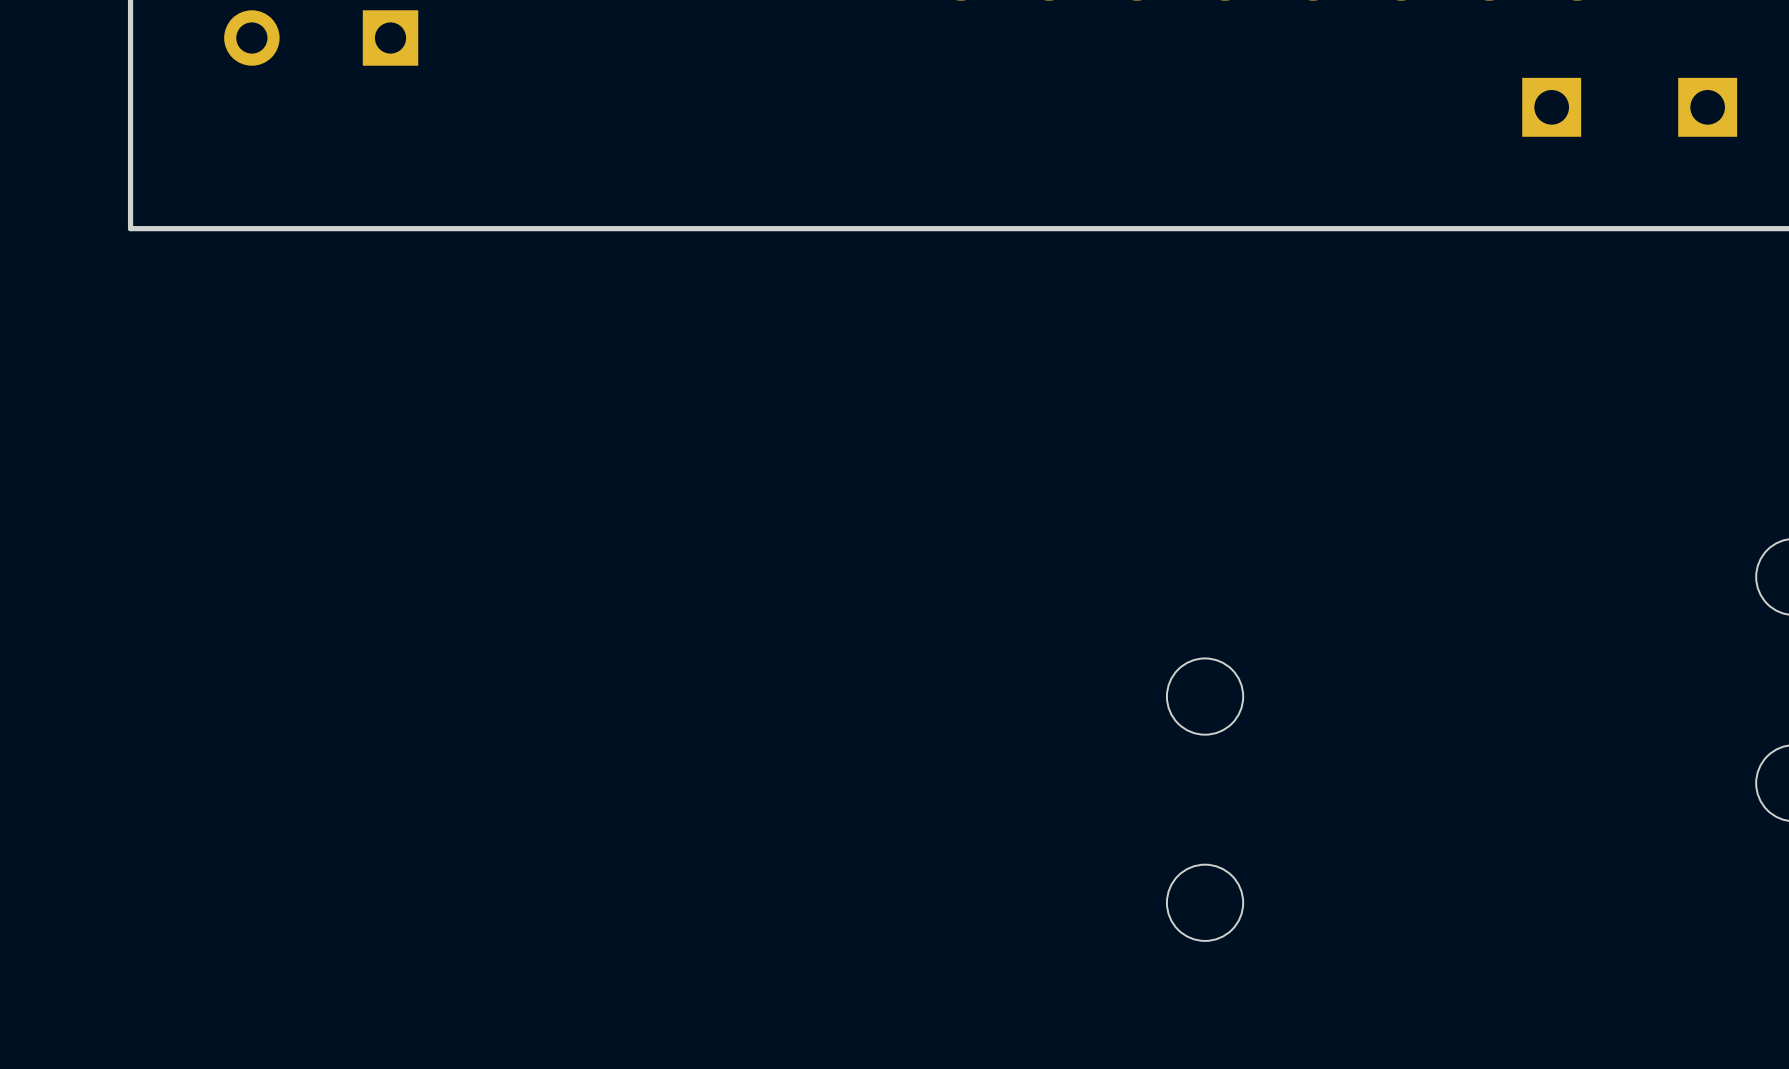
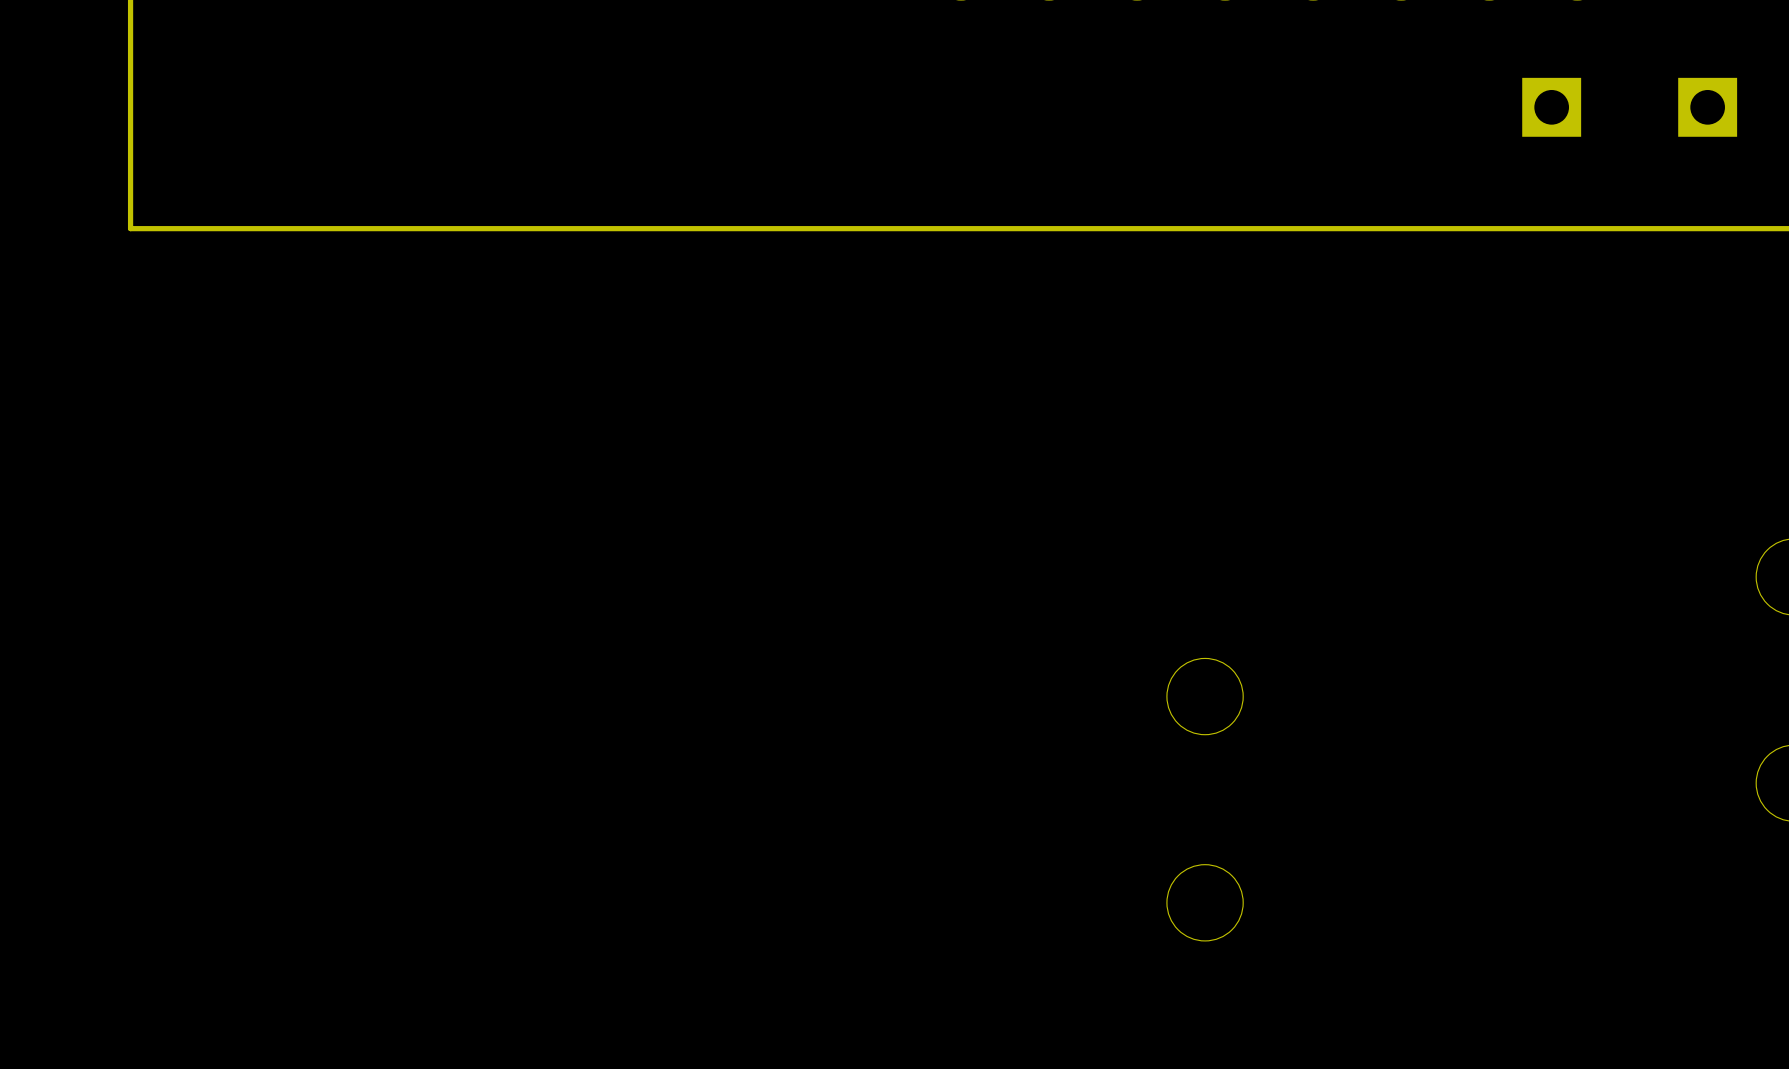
part: (321, 38) -> none

